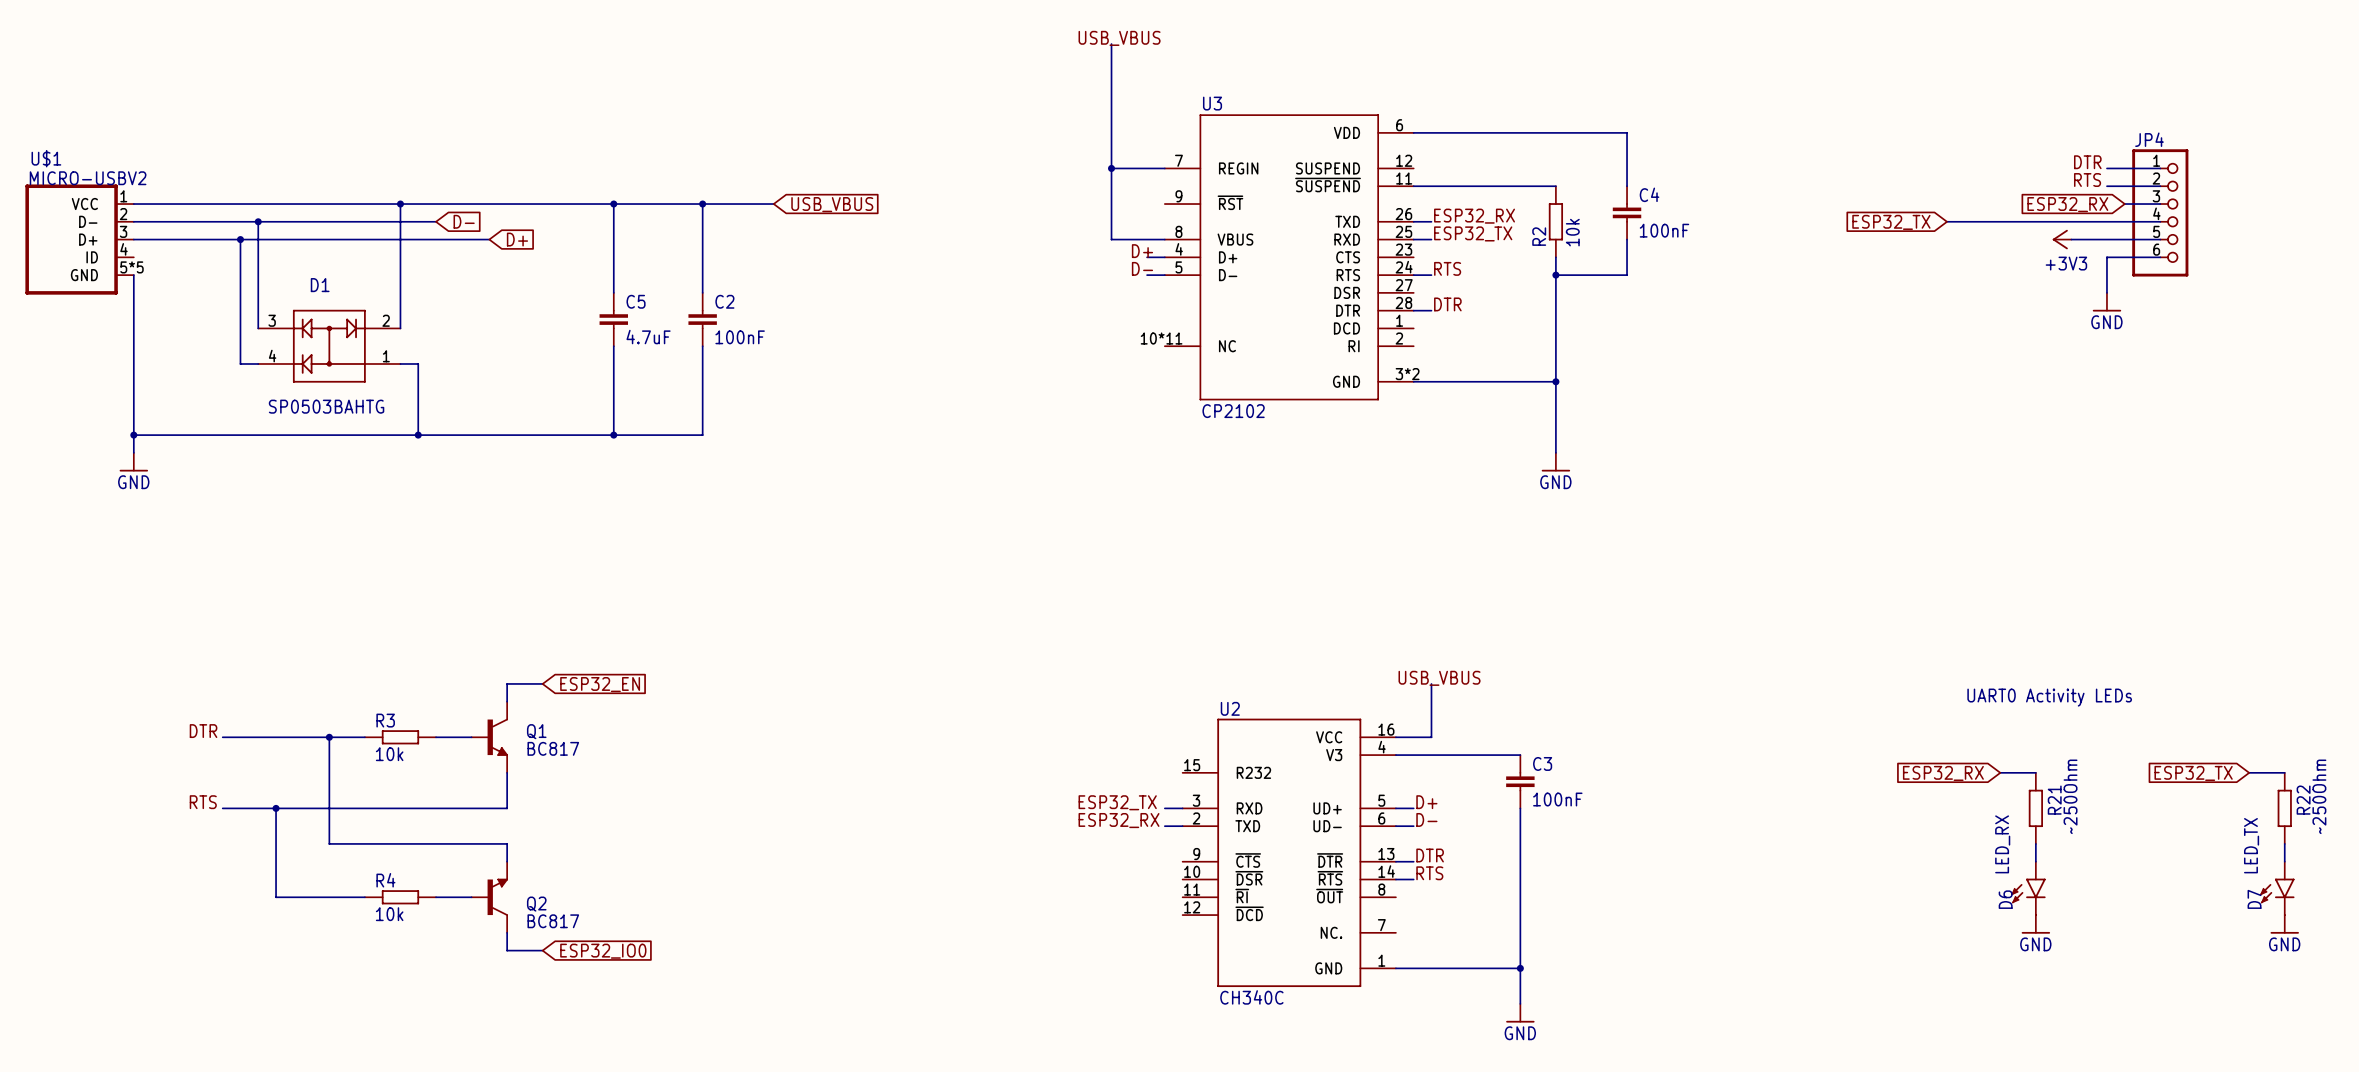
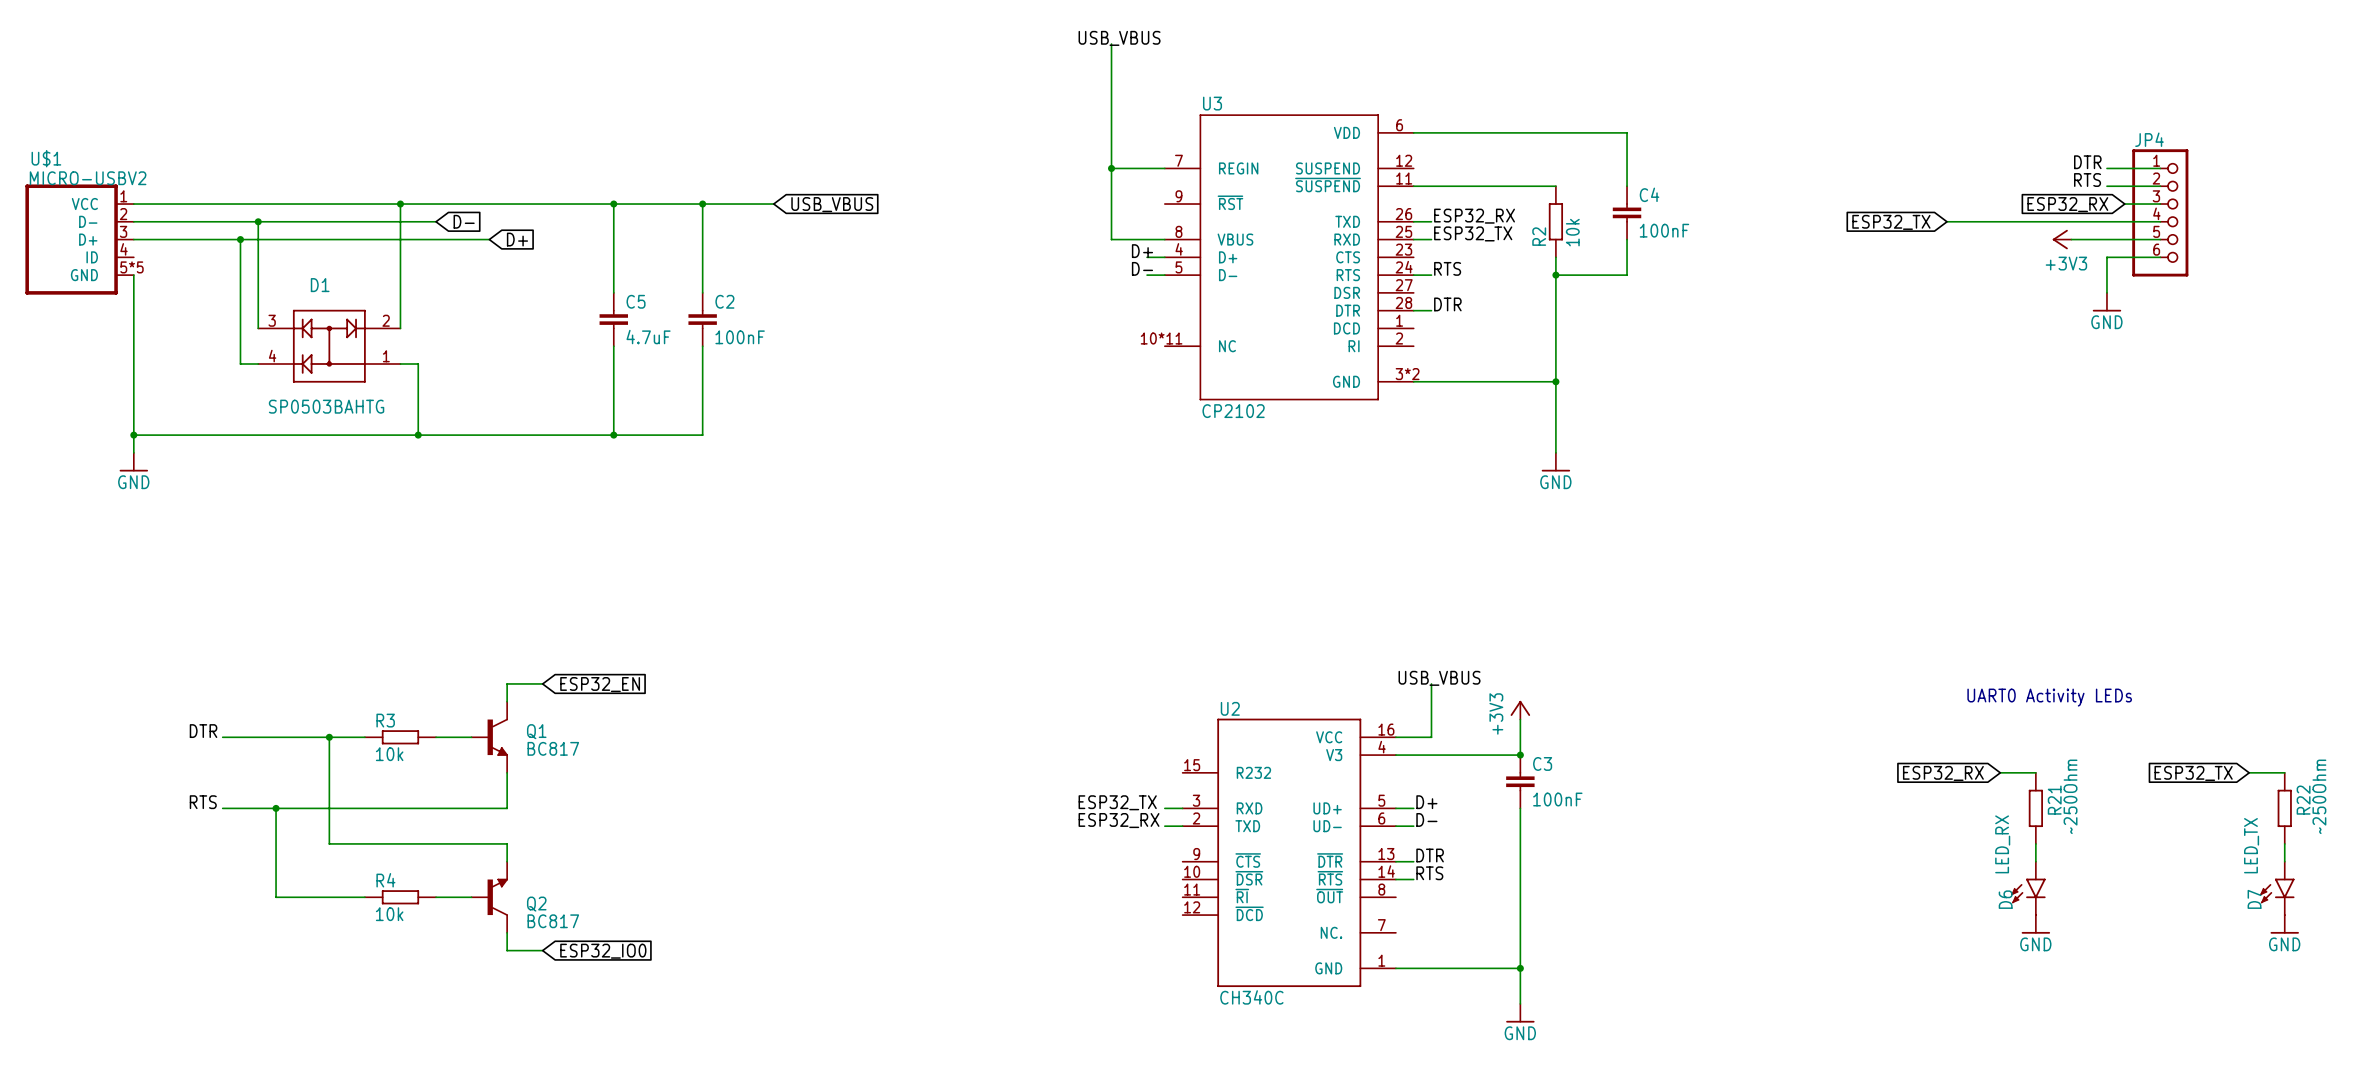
power symbol: none -> +3V3 (1520, 710)
wire: none -> (1520, 719) (1520, 755)
junction: none -> (1520, 755)

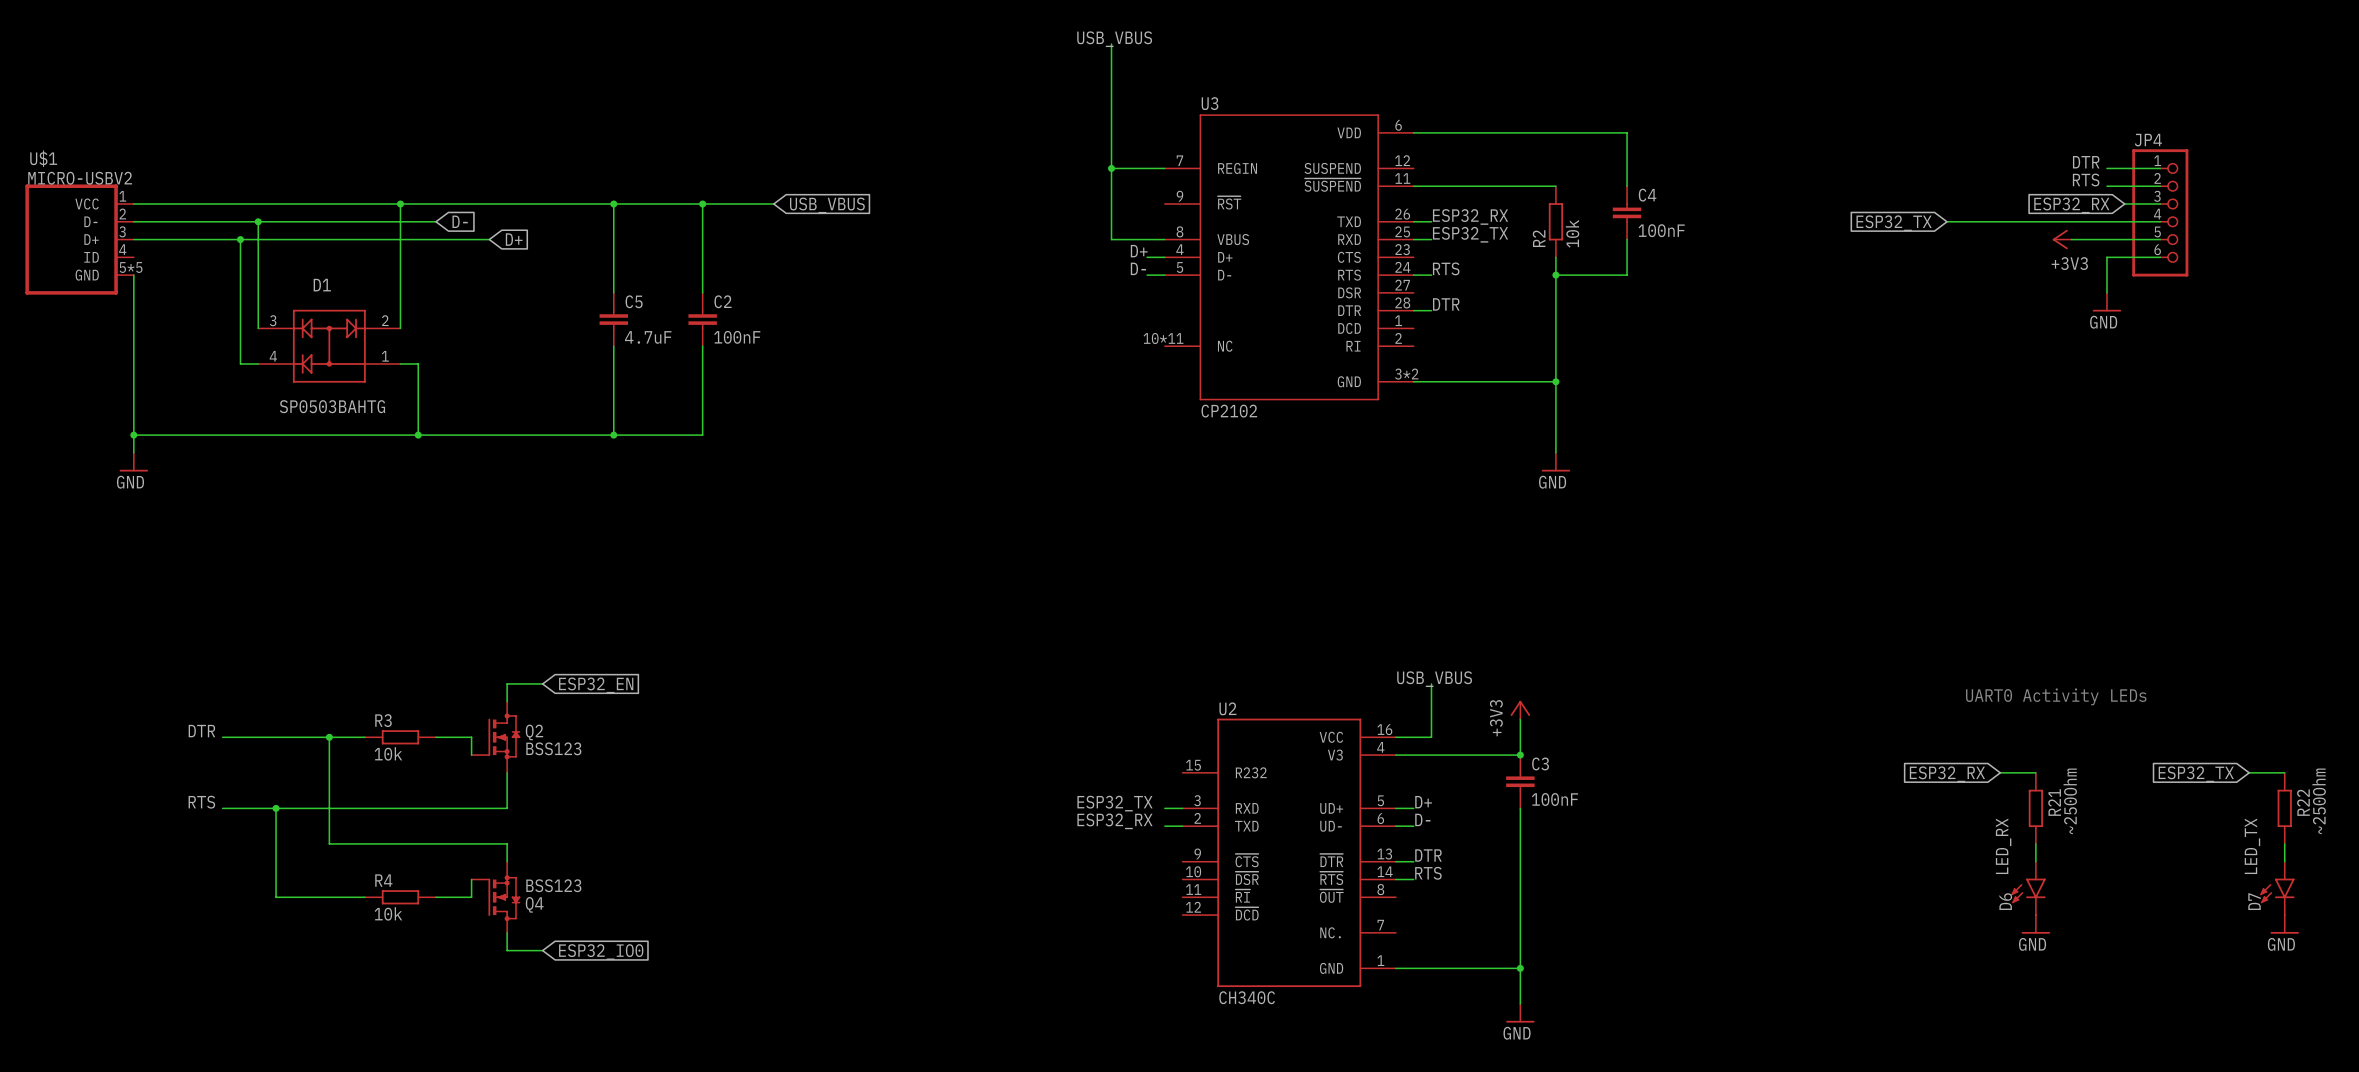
wire: none -> (471, 737) (471, 755)
Q1: BC817 (489, 737) -> none
Q2 symbol: [471, 861, 508, 933] -> [471, 701, 521, 773]
wire: none -> (471, 879) (471, 897)
Q4: none -> BSS123 (495, 897)
Q2 value: BC817 (553, 921) -> BSS123 (553, 748)

